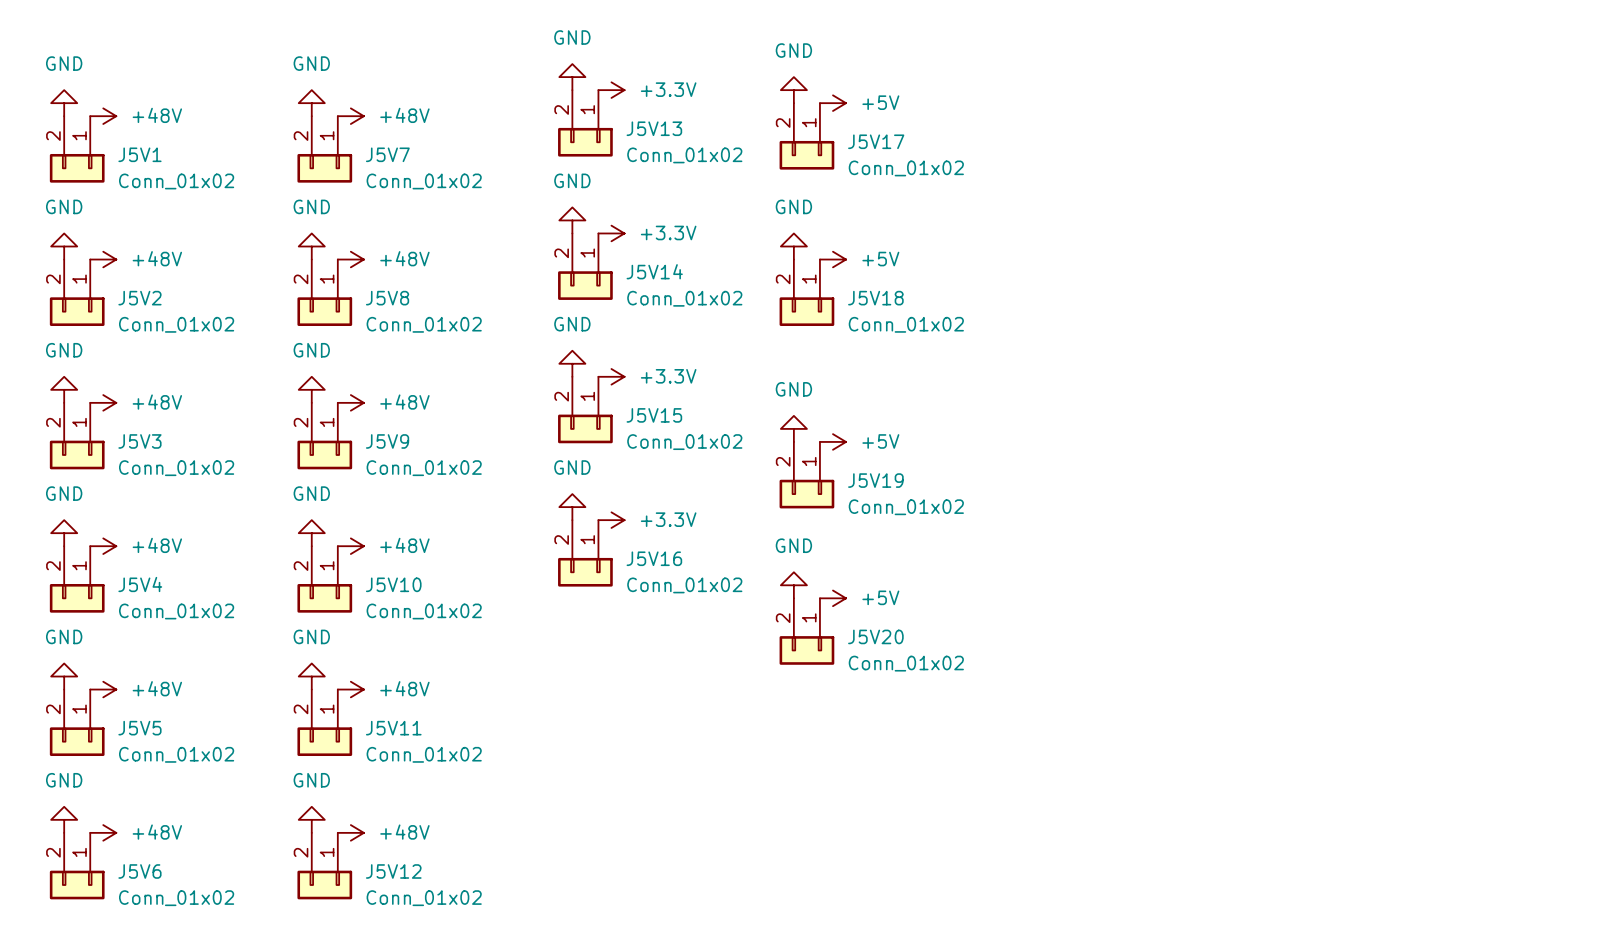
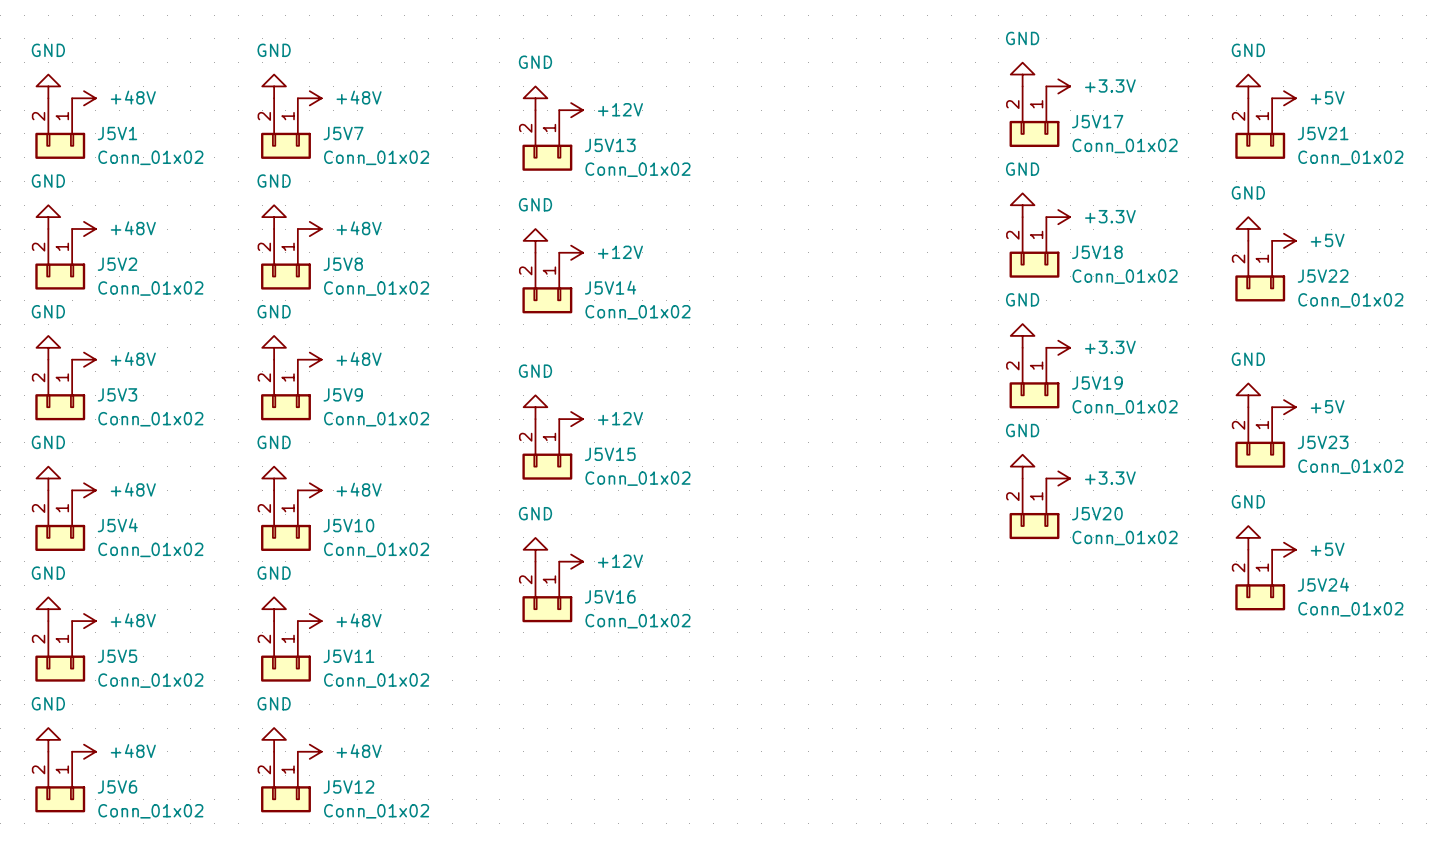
power symbol position: GND (572, 77) -> GND (535, 98)
power symbol: +3.3V (611, 90) -> none
power symbol: GND (793, 90) -> none
power symbol: none -> GND (1022, 74)
power symbol: +5V (832, 103) -> none
power symbol: none -> +3.3V (1058, 86)
power symbol: none -> GND (1248, 86)
power symbol: none -> +5V (1283, 98)
J5V13 position: (585, 123) -> (547, 140)
power symbol: none -> +12V (571, 110)
J5V17 position: (806, 136) -> (1034, 116)
J5V21: none -> Conn_01x02 (1260, 128)
power symbol: GND (572, 220) -> none
power symbol: +3.3V (611, 233) -> none
power symbol: none -> GND (1022, 205)
power symbol: GND (793, 246) -> none
power symbol: none -> +3.3V (1058, 217)
power symbol: +5V (832, 259) -> none
power symbol: none -> GND (1248, 229)
J5V14 position: (585, 266) -> (547, 283)
power symbol: none -> GND (535, 240)
power symbol: none -> +5V (1283, 240)
power symbol: none -> +12V (571, 252)
J5V18 position: (806, 292) -> (1034, 247)
J5V22: none -> Conn_01x02 (1260, 271)
power symbol: GND (572, 363) -> none
power symbol: +3.3V (611, 376) -> none
power symbol: none -> GND (1022, 335)
power symbol: none -> +3.3V (1058, 347)
J5V15 position: (585, 410) -> (547, 449)
power symbol: GND (793, 428) -> none
power symbol: +5V (832, 441) -> none
power symbol: none -> GND (1248, 395)
power symbol: none -> GND (535, 407)
power symbol: none -> +5V (1283, 407)
power symbol: none -> +12V (571, 419)
J5V19 position: (806, 475) -> (1034, 378)
J5V23: none -> Conn_01x02 (1260, 437)
power symbol: GND (572, 507) -> none
power symbol: +3.3V (611, 520) -> none
power symbol: none -> GND (1022, 466)
power symbol: none -> +3.3V (1058, 478)
J5V16 position: (585, 553) -> (547, 591)
power symbol: GND (793, 585) -> none
power symbol: +5V (832, 598) -> none
power symbol: none -> GND (1248, 537)
power symbol: none -> GND (535, 549)
power symbol: none -> +5V (1283, 549)
power symbol: none -> +12V (571, 561)
J5V20 position: (806, 631) -> (1034, 508)
J5V24: none -> Conn_01x02 (1260, 580)

